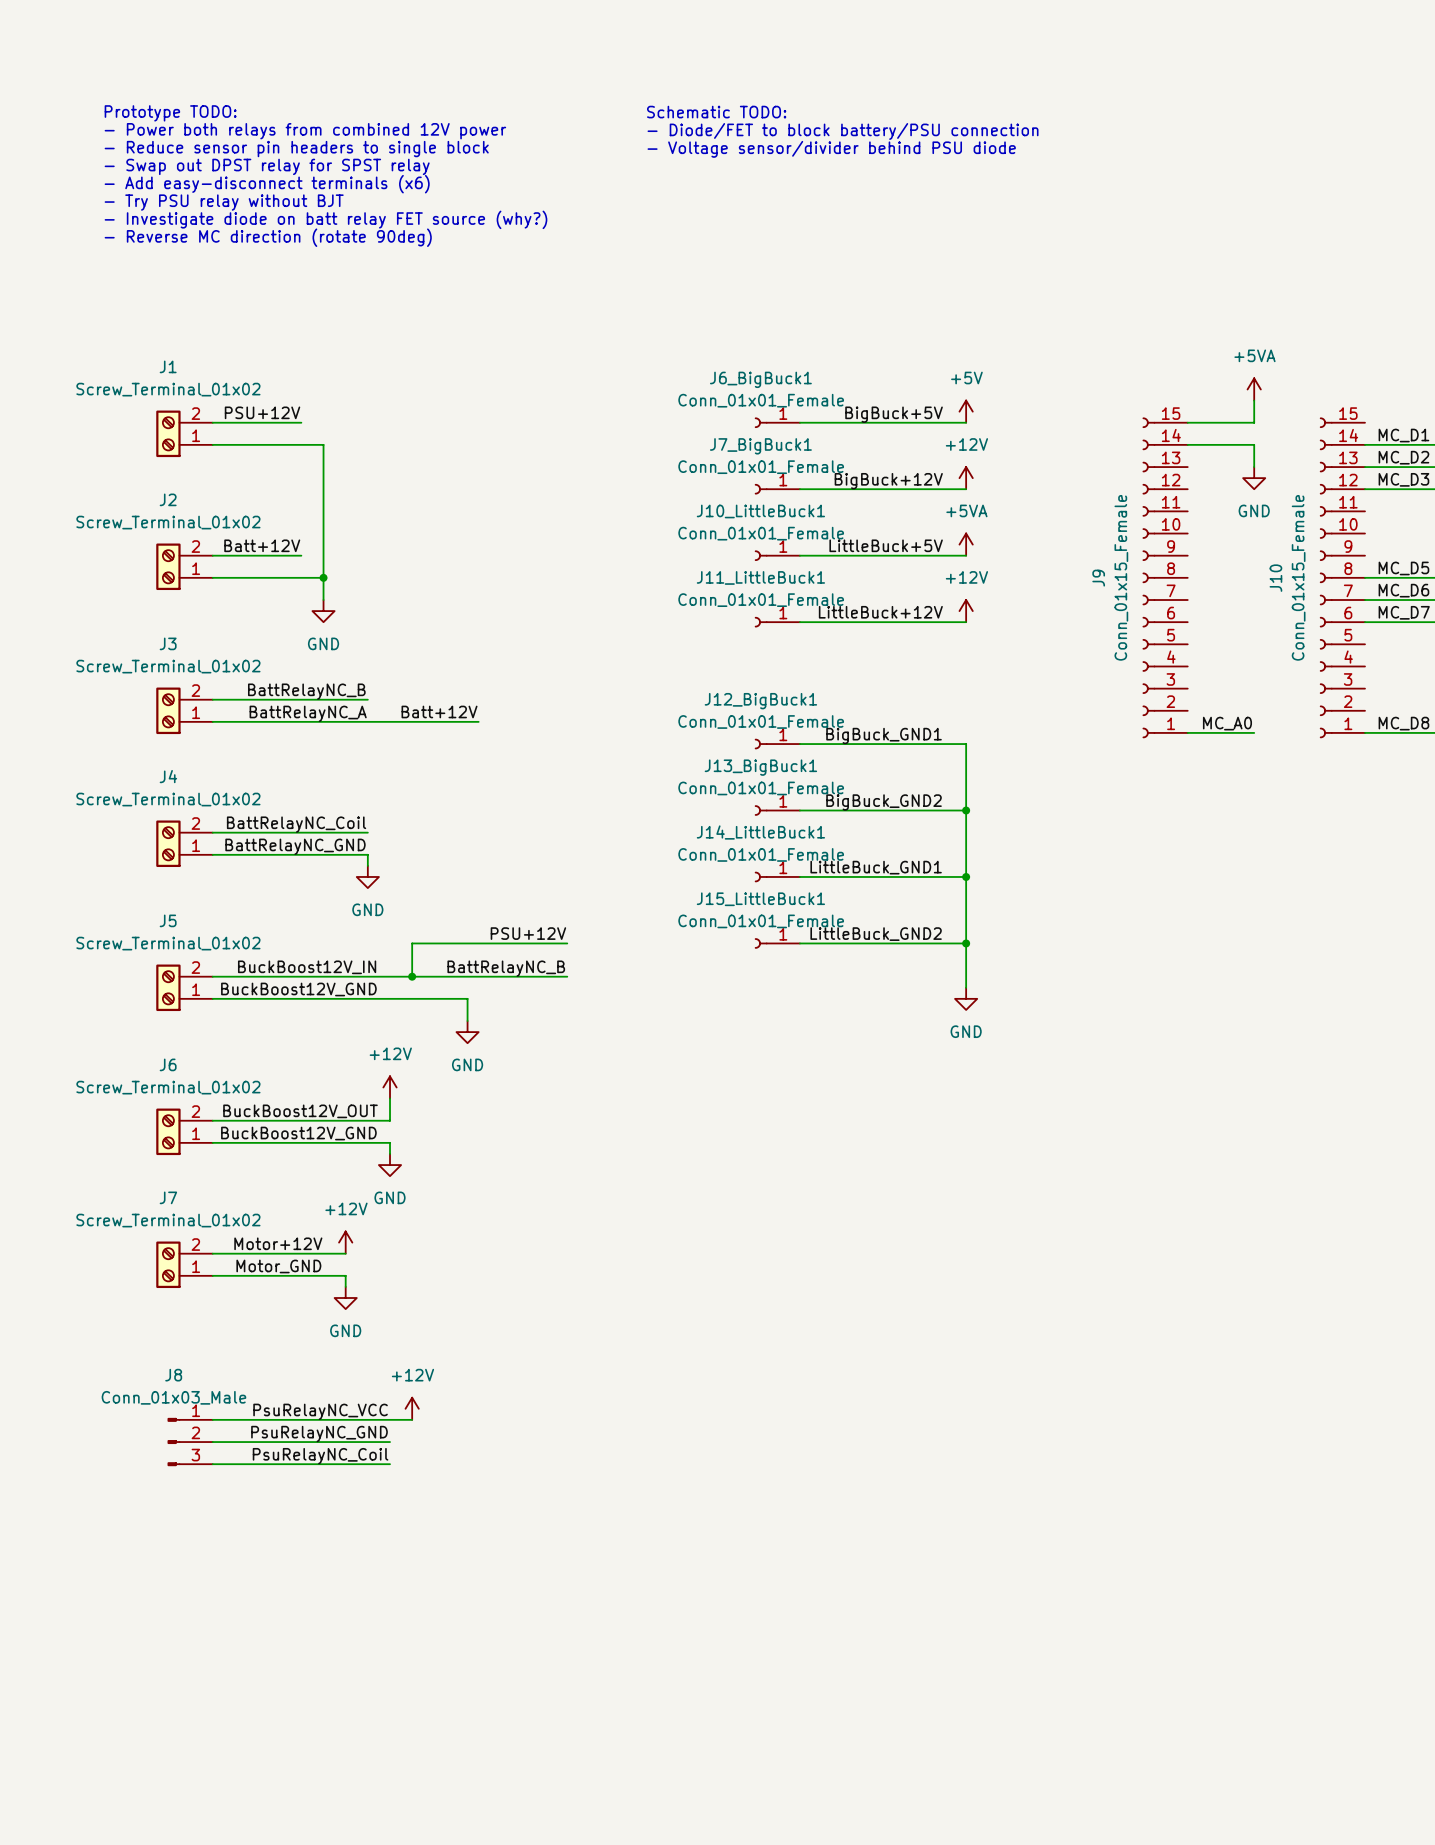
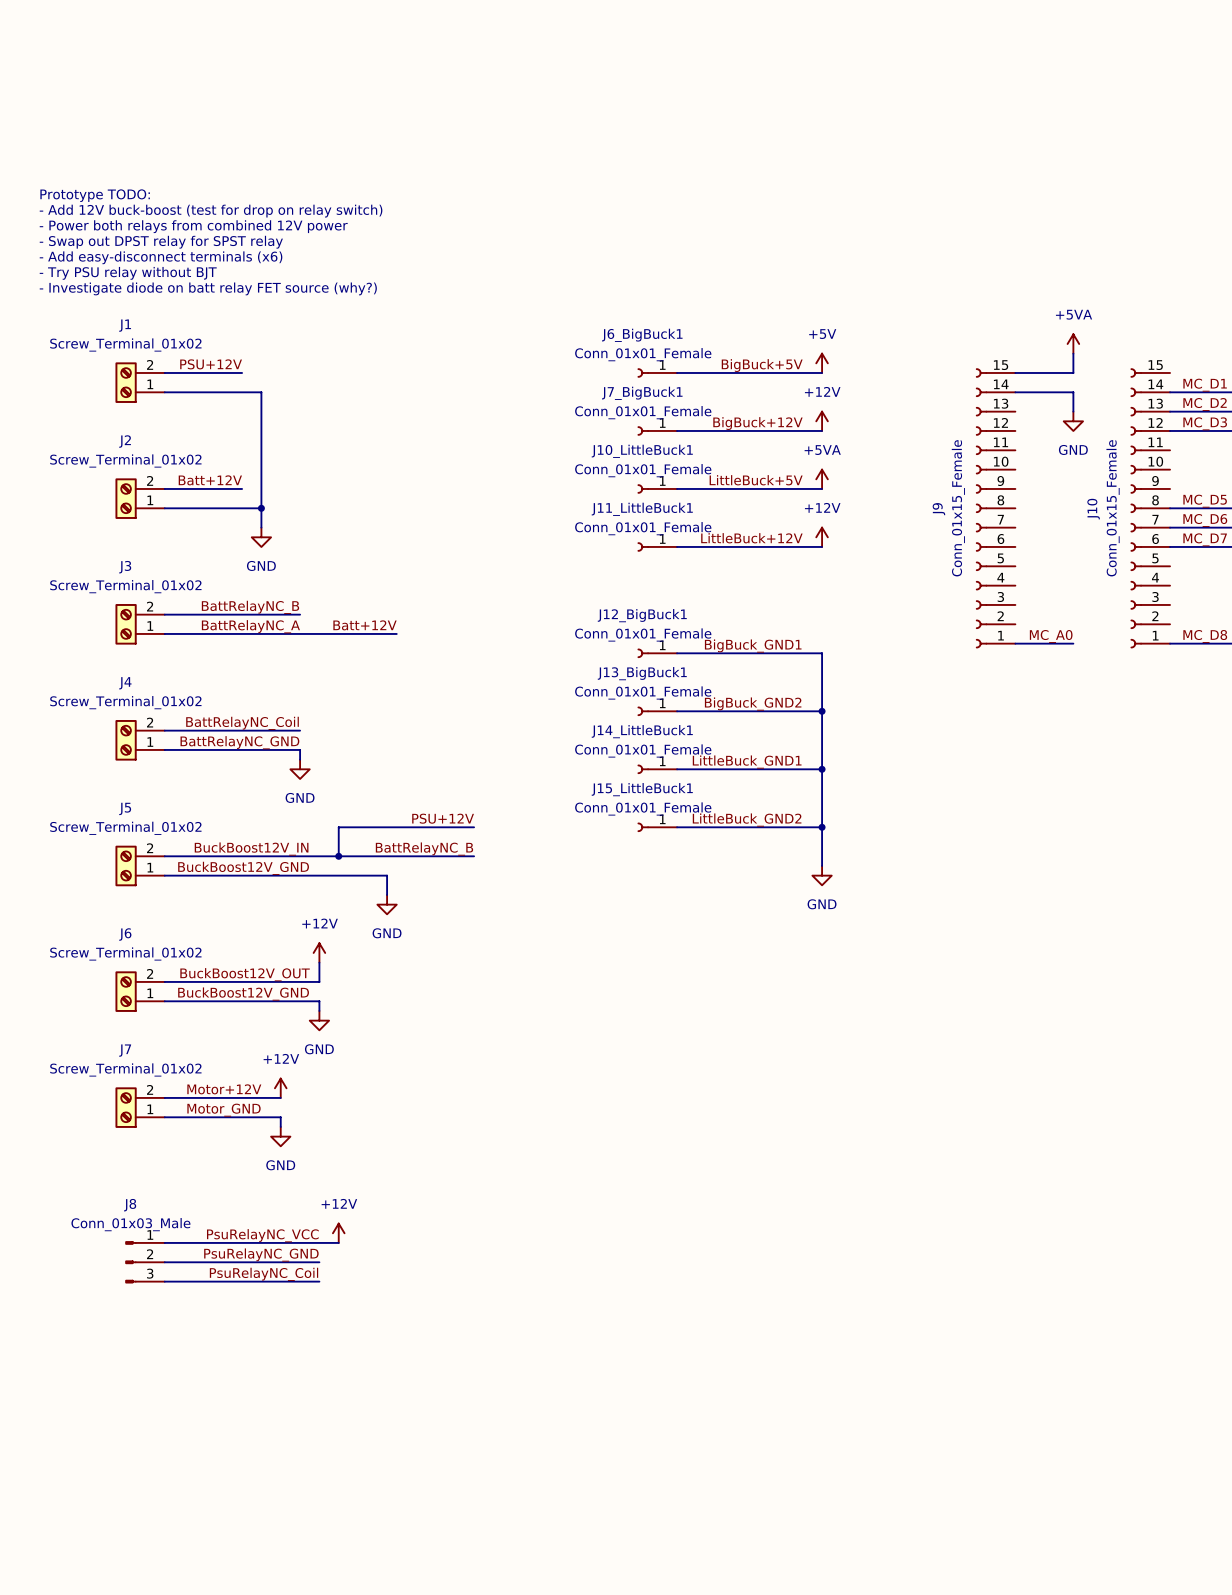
text: Schematic TODO: (716, 112) -> none
text position: Prototype TODO: (170, 113) -> Prototype TODO: (95, 195)
text position: - Power both relays from combined 12V power (305, 131) -> - Power both relays from combined 12V power (193, 226)
text: - Diode/FET to block battery/PSU connection (843, 131) -> none
text: - Reduce sensor pin headers to single block (296, 149) -> none
text: - Voltage sensor/divider behind PSU diode (831, 149) -> none
text position: - Swap out DPST relay for SPST relay (267, 166) -> - Swap out DPST relay for SPST relay (161, 242)
text position: - Add easy-disconnect terminals (x6) (267, 184) -> - Add easy-disconnect terminals (x6) (161, 257)
text position: - Try PSU relay without BJT (224, 202) -> - Try PSU relay without BJT (128, 273)
text position: - Investigate diode on batt relay FET source (why?) (325, 219) -> - Investigate diode on batt relay FET source (why?) (208, 288)
text: - Reverse MC direction (rotate 90deg) (268, 237) -> none
text: none -> - Add 12V buck-boost (test for drop on relay switch) (211, 211)

